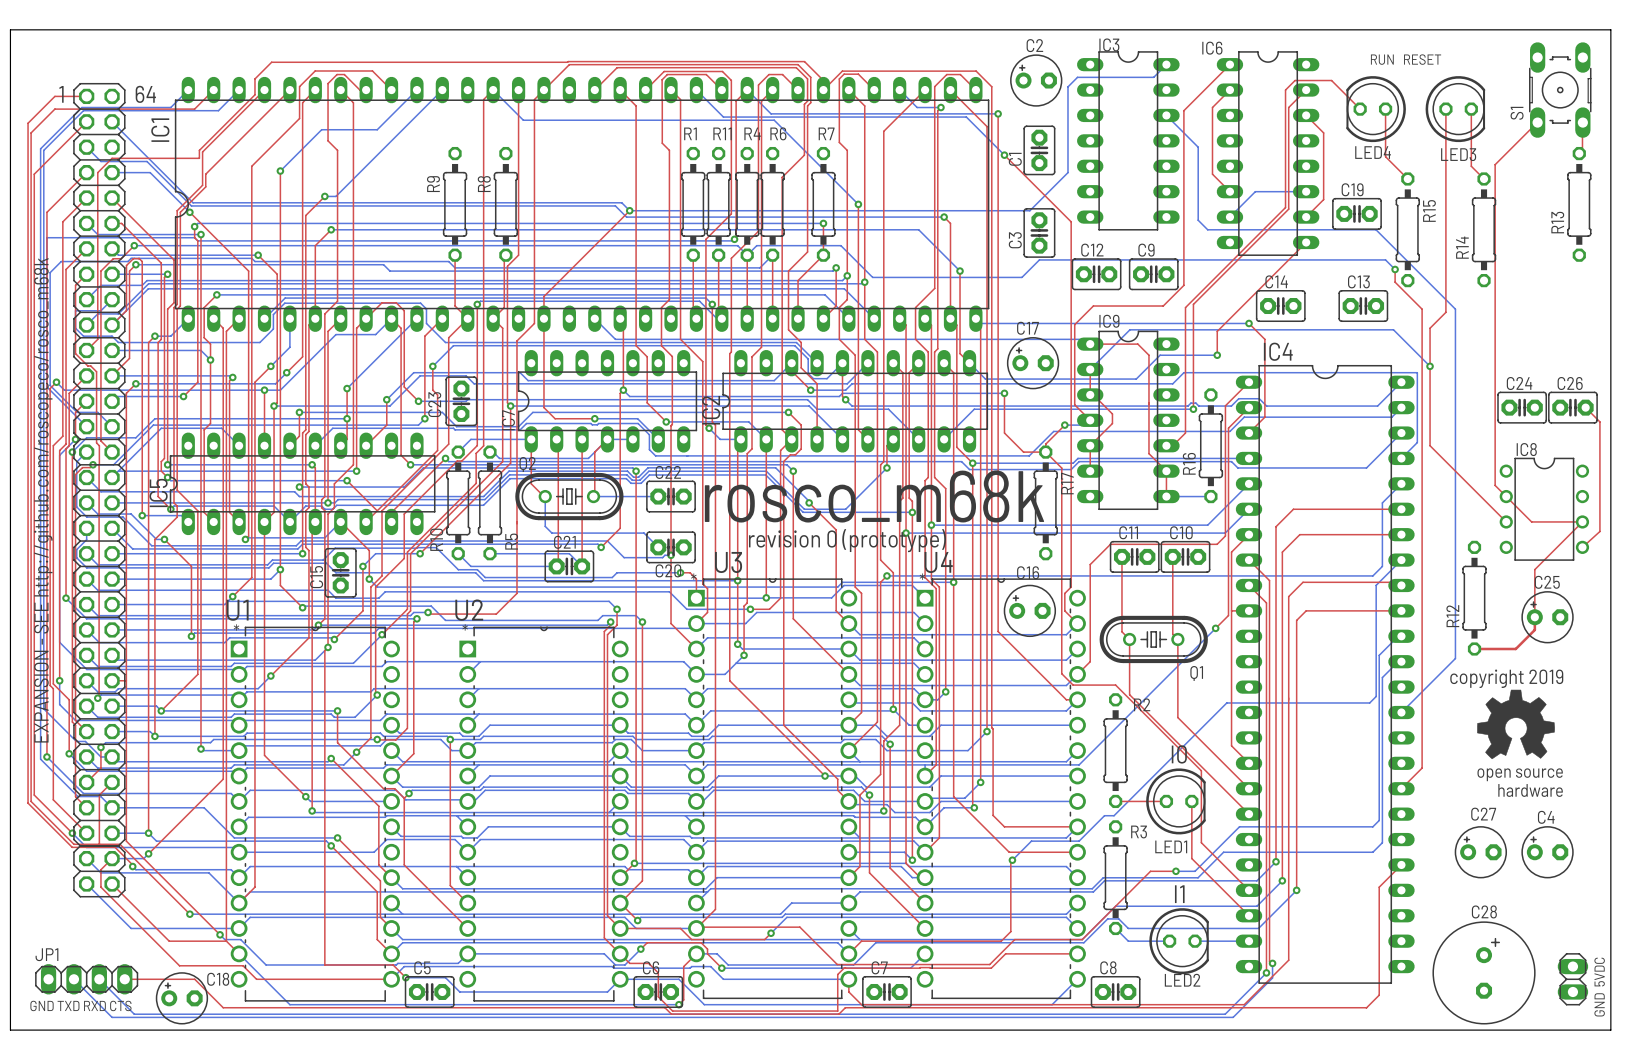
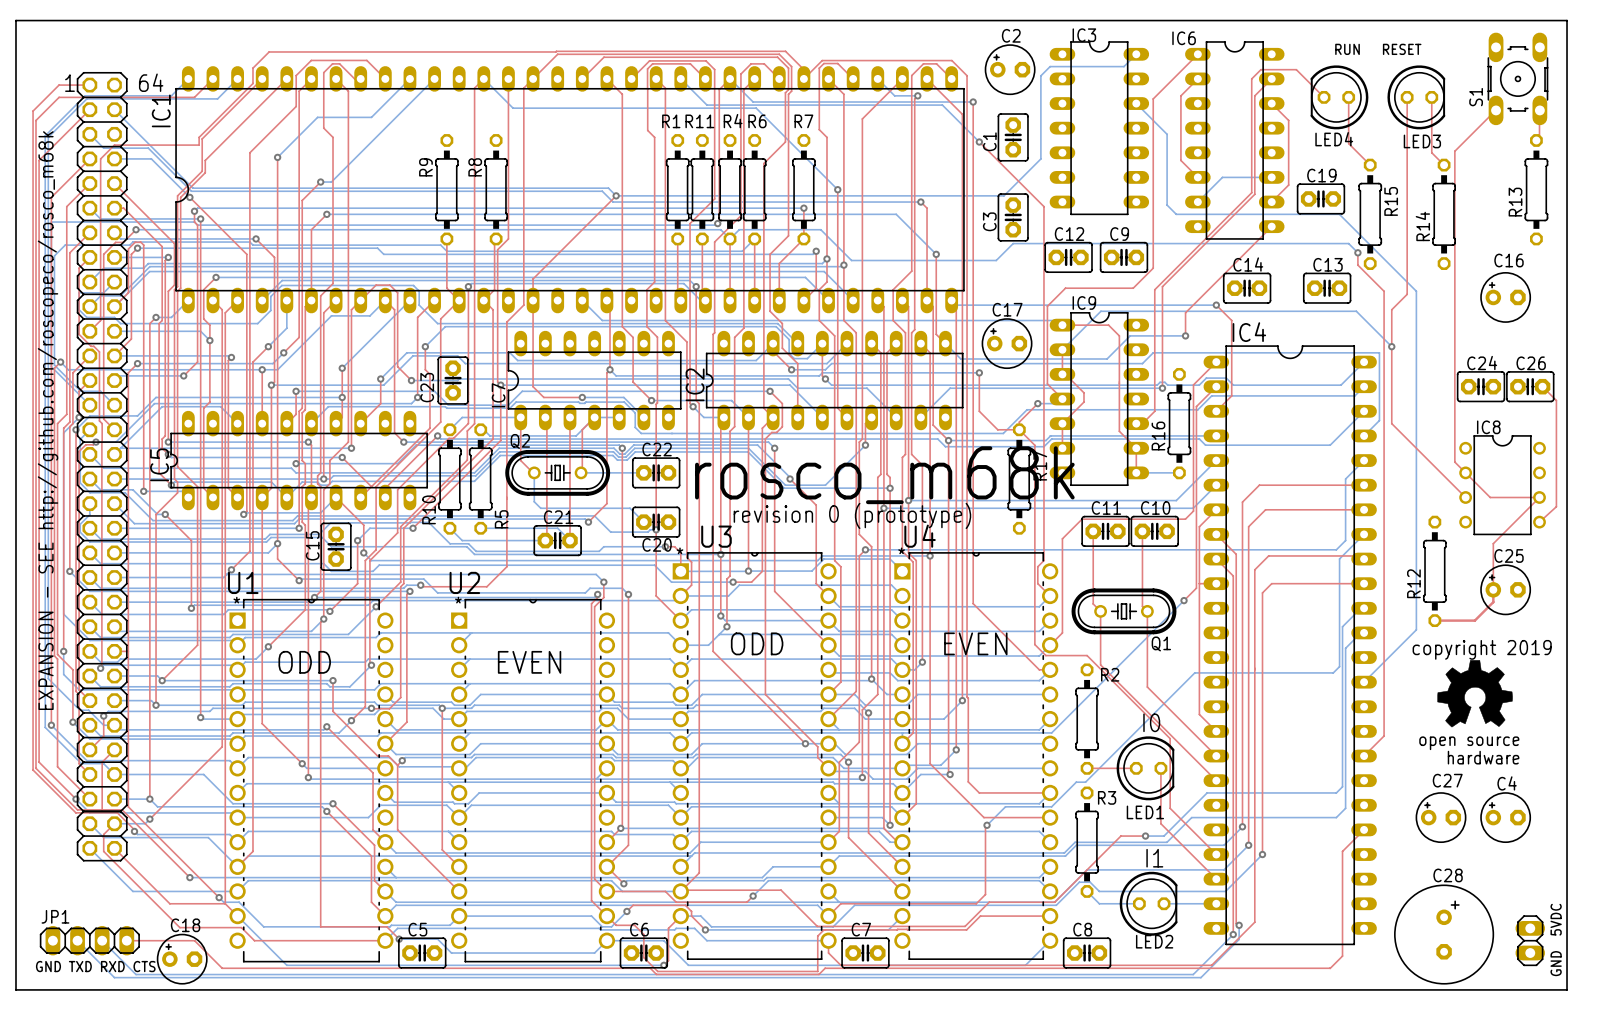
C16 position: (1029, 610) -> (1505, 297)
text: none -> ODD (757, 643)
text: none -> EVEN (975, 643)
text: none -> ODD (304, 662)
text: none -> EVEN (529, 662)
C18 name position: C18 (218, 979) -> C18 (185, 925)

